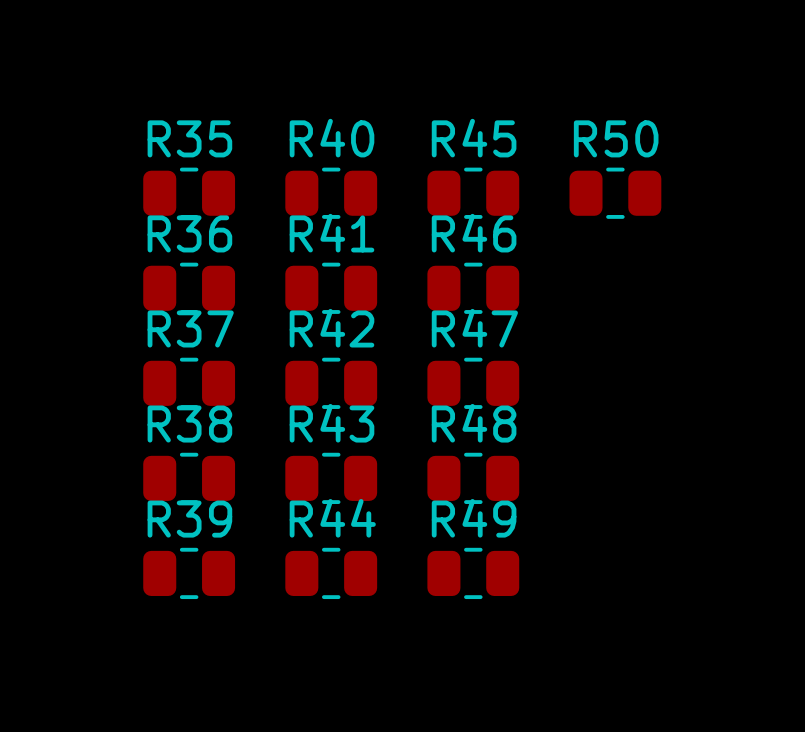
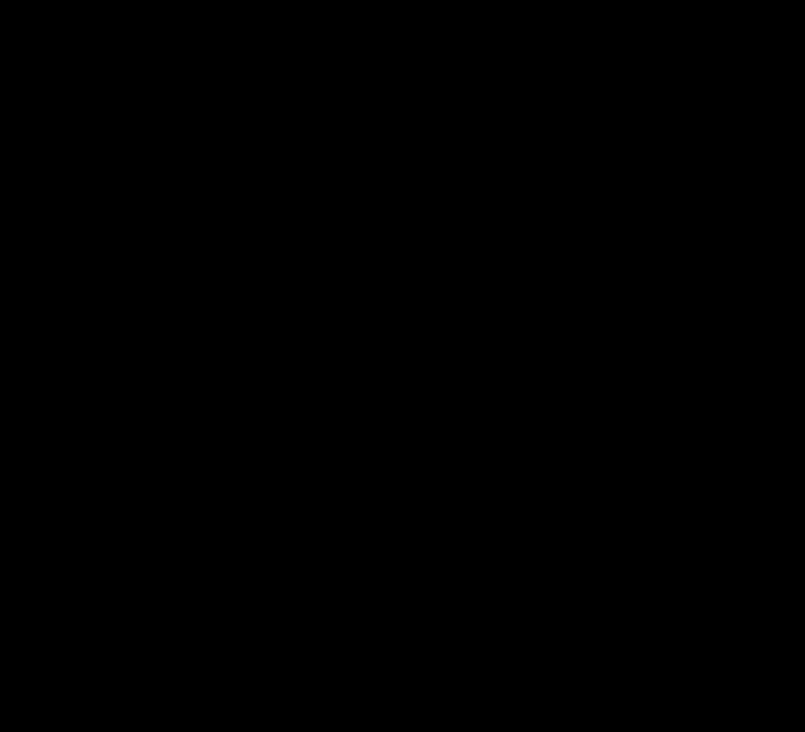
R35: (189, 193) -> none
R40: (331, 193) -> none
R45: (473, 193) -> none
R50: (615, 193) -> none
R36: (189, 288) -> none
R41: (331, 288) -> none
R46: (473, 288) -> none
R37: (189, 383) -> none
R42: (331, 383) -> none
R47: (473, 383) -> none
R38: (189, 478) -> none
R43: (331, 478) -> none
R48: (473, 478) -> none
R39: (189, 573) -> none
R44: (331, 573) -> none
R49: (473, 573) -> none

